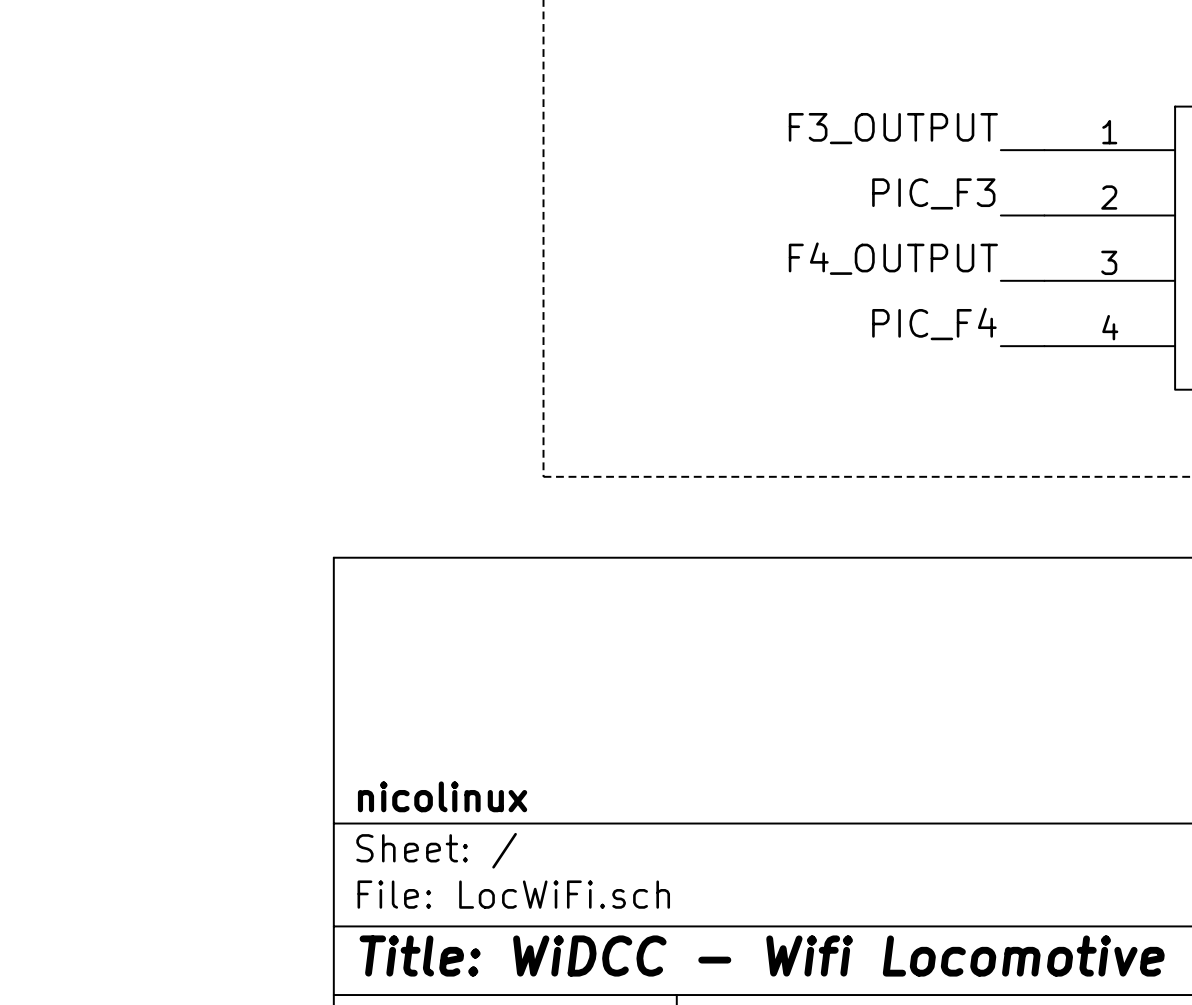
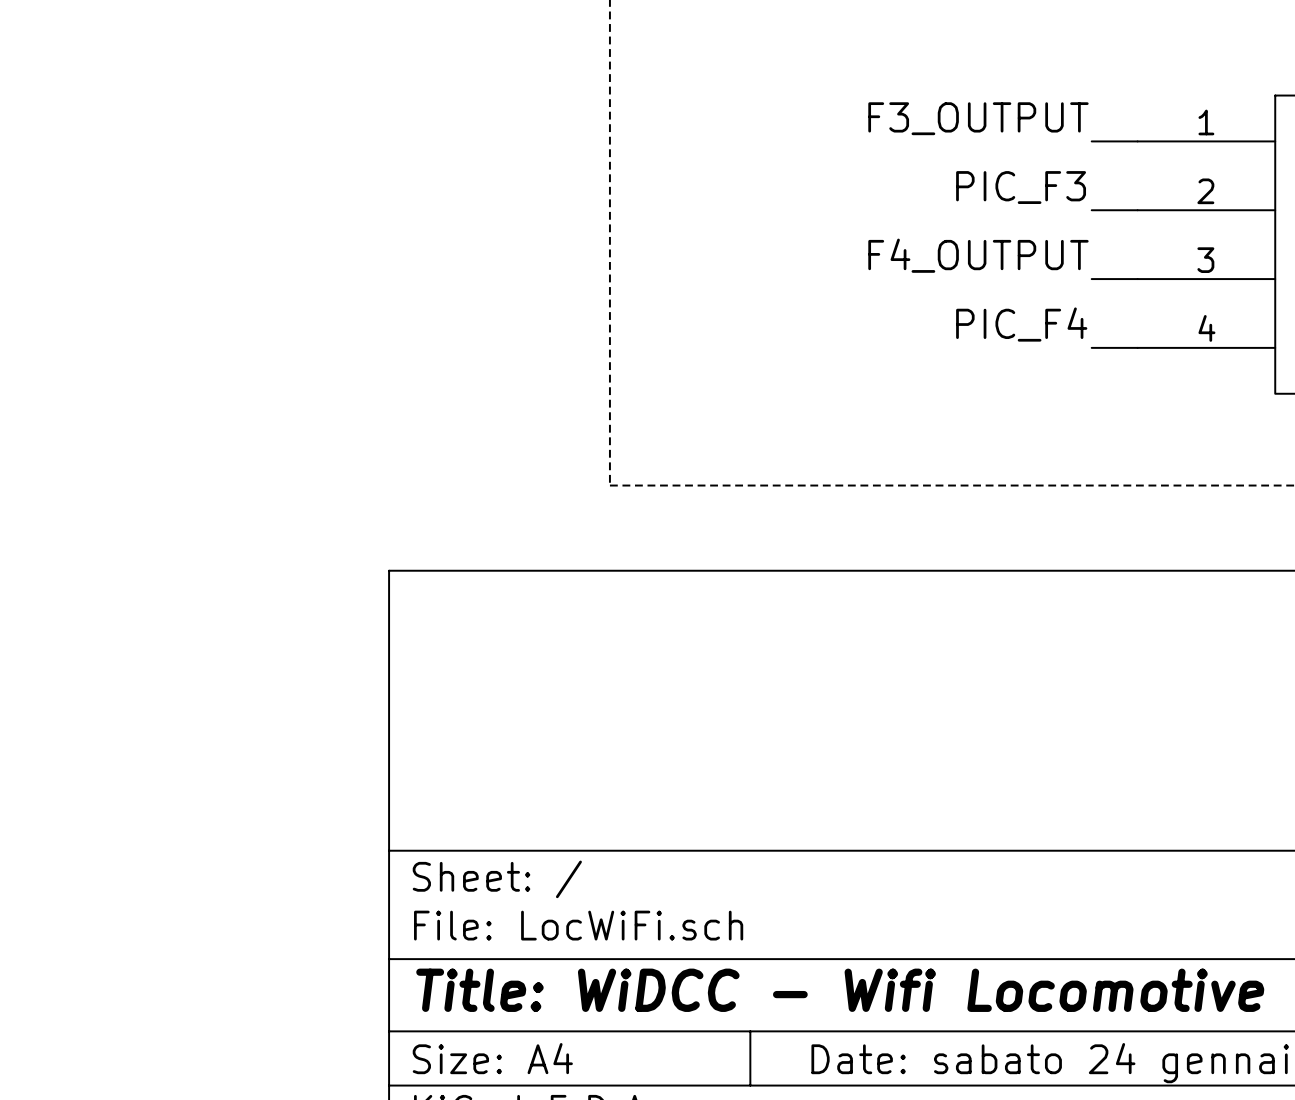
title block: nicolinux (442, 796) -> none

